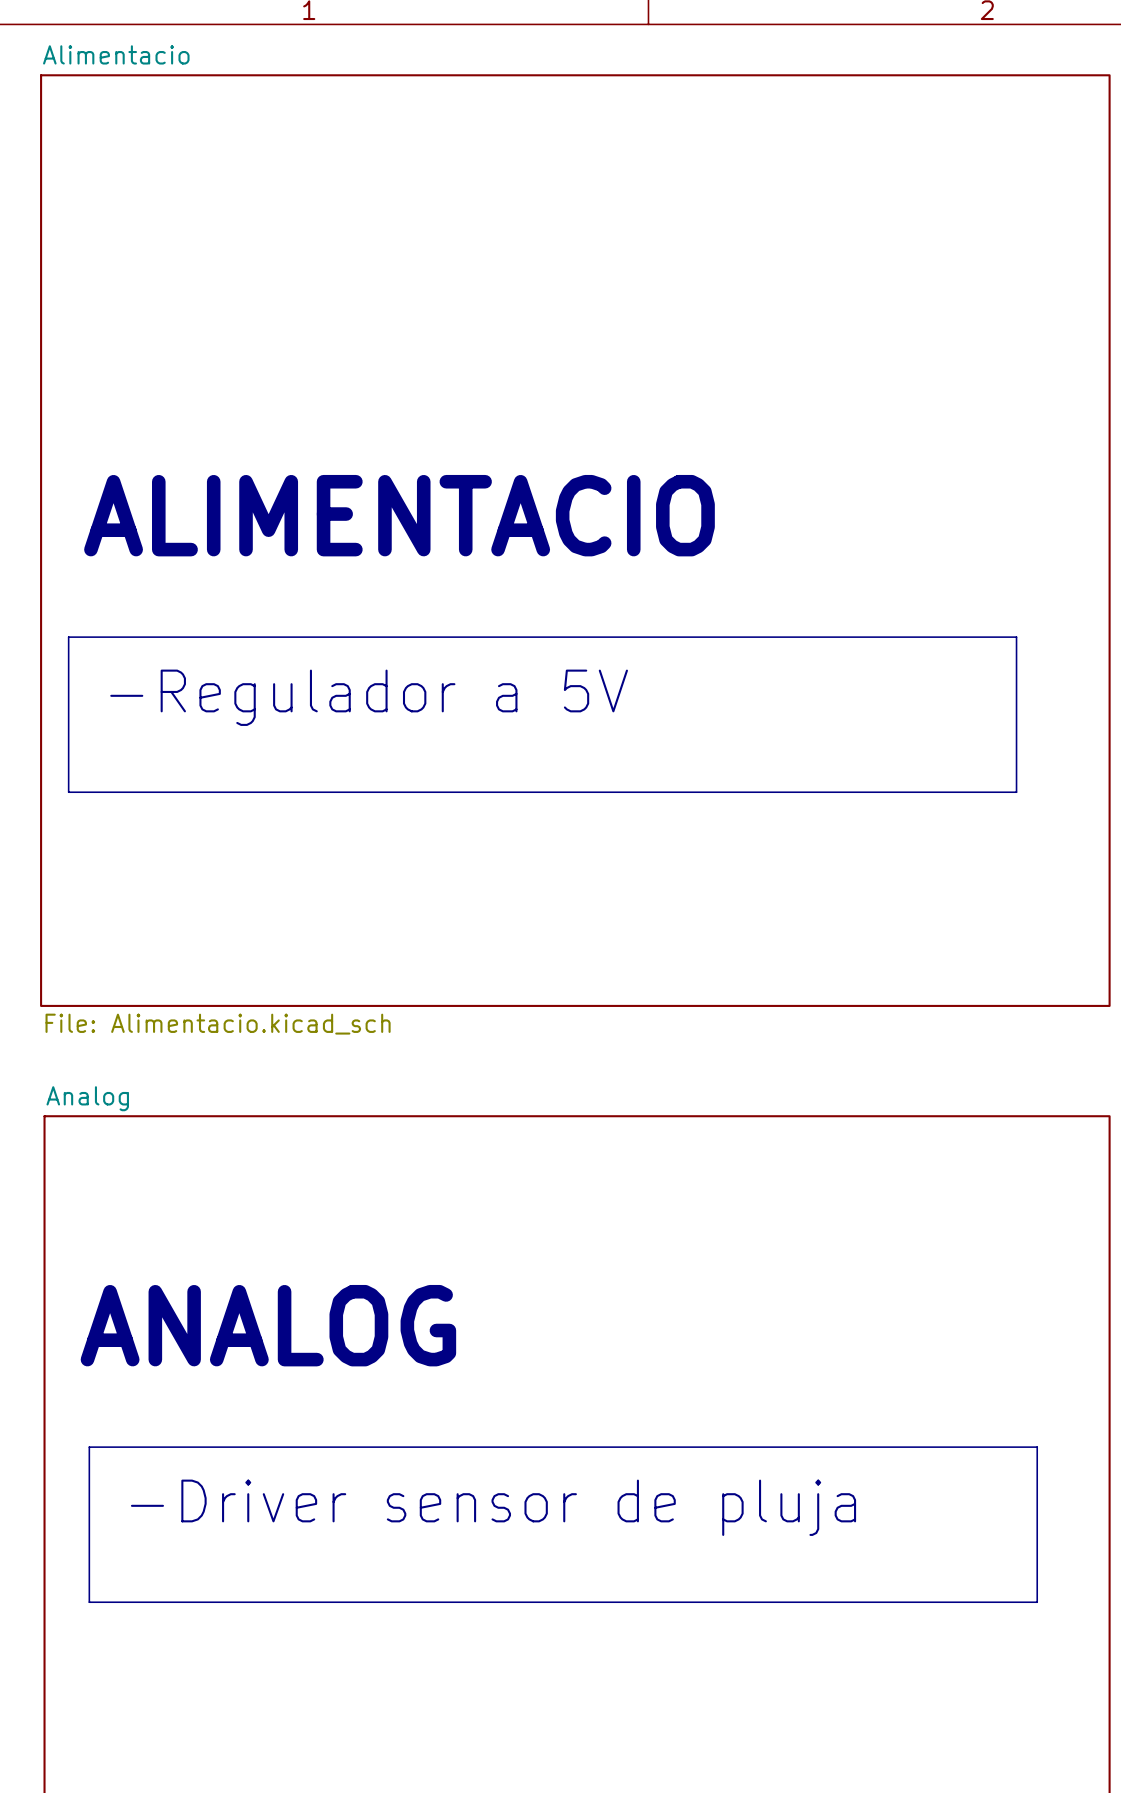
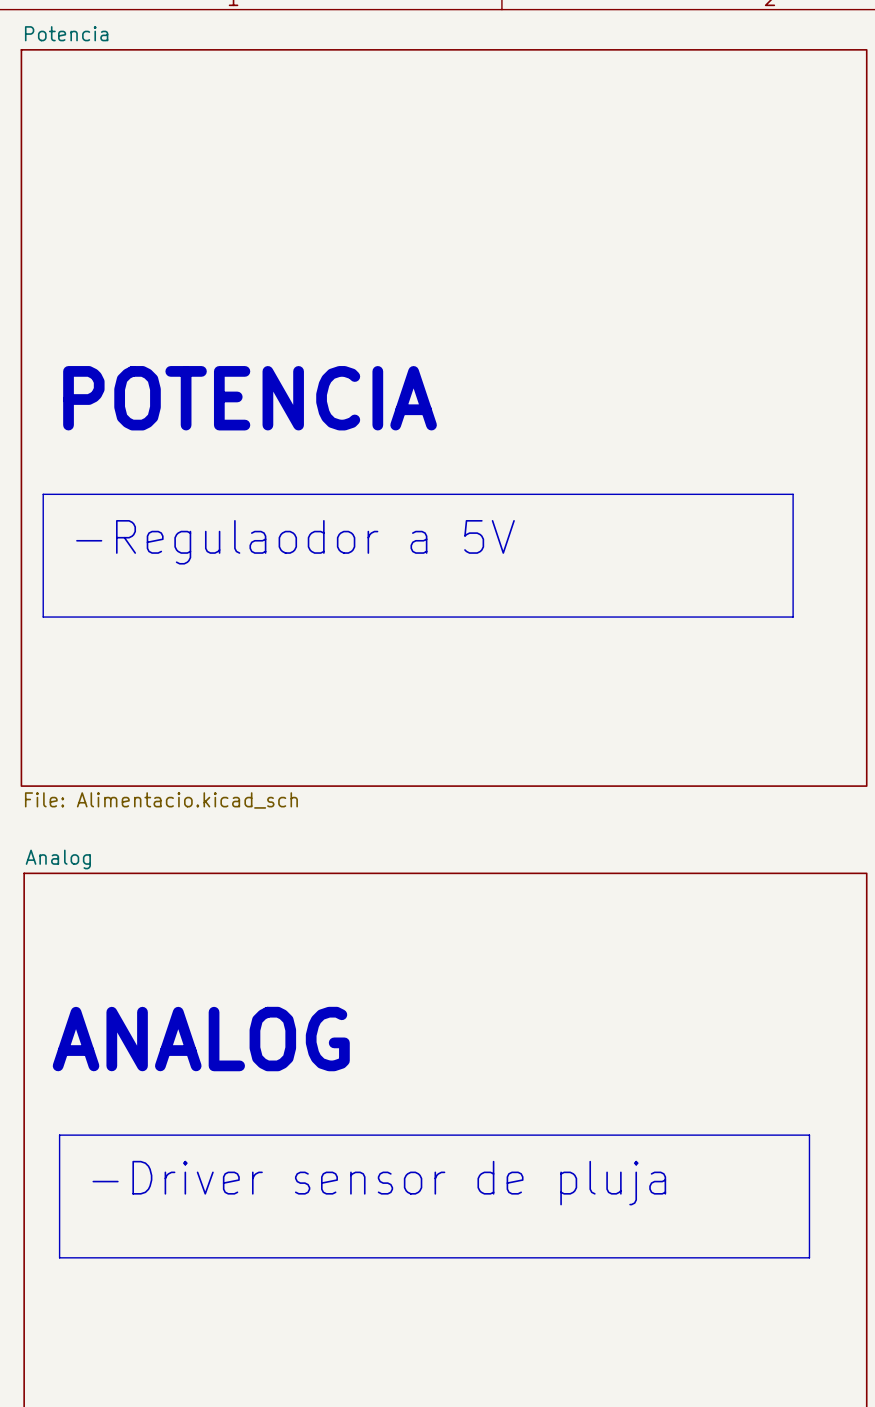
sheet Alimentacio name: Alimentacio (116, 54) -> Potencia (66, 33)
text: ALIMENTACIO (399, 515) -> POTENCIA (250, 398)
text: -Regulador a 5V (369, 697) -> -Regulaodor a 5V (295, 542)

